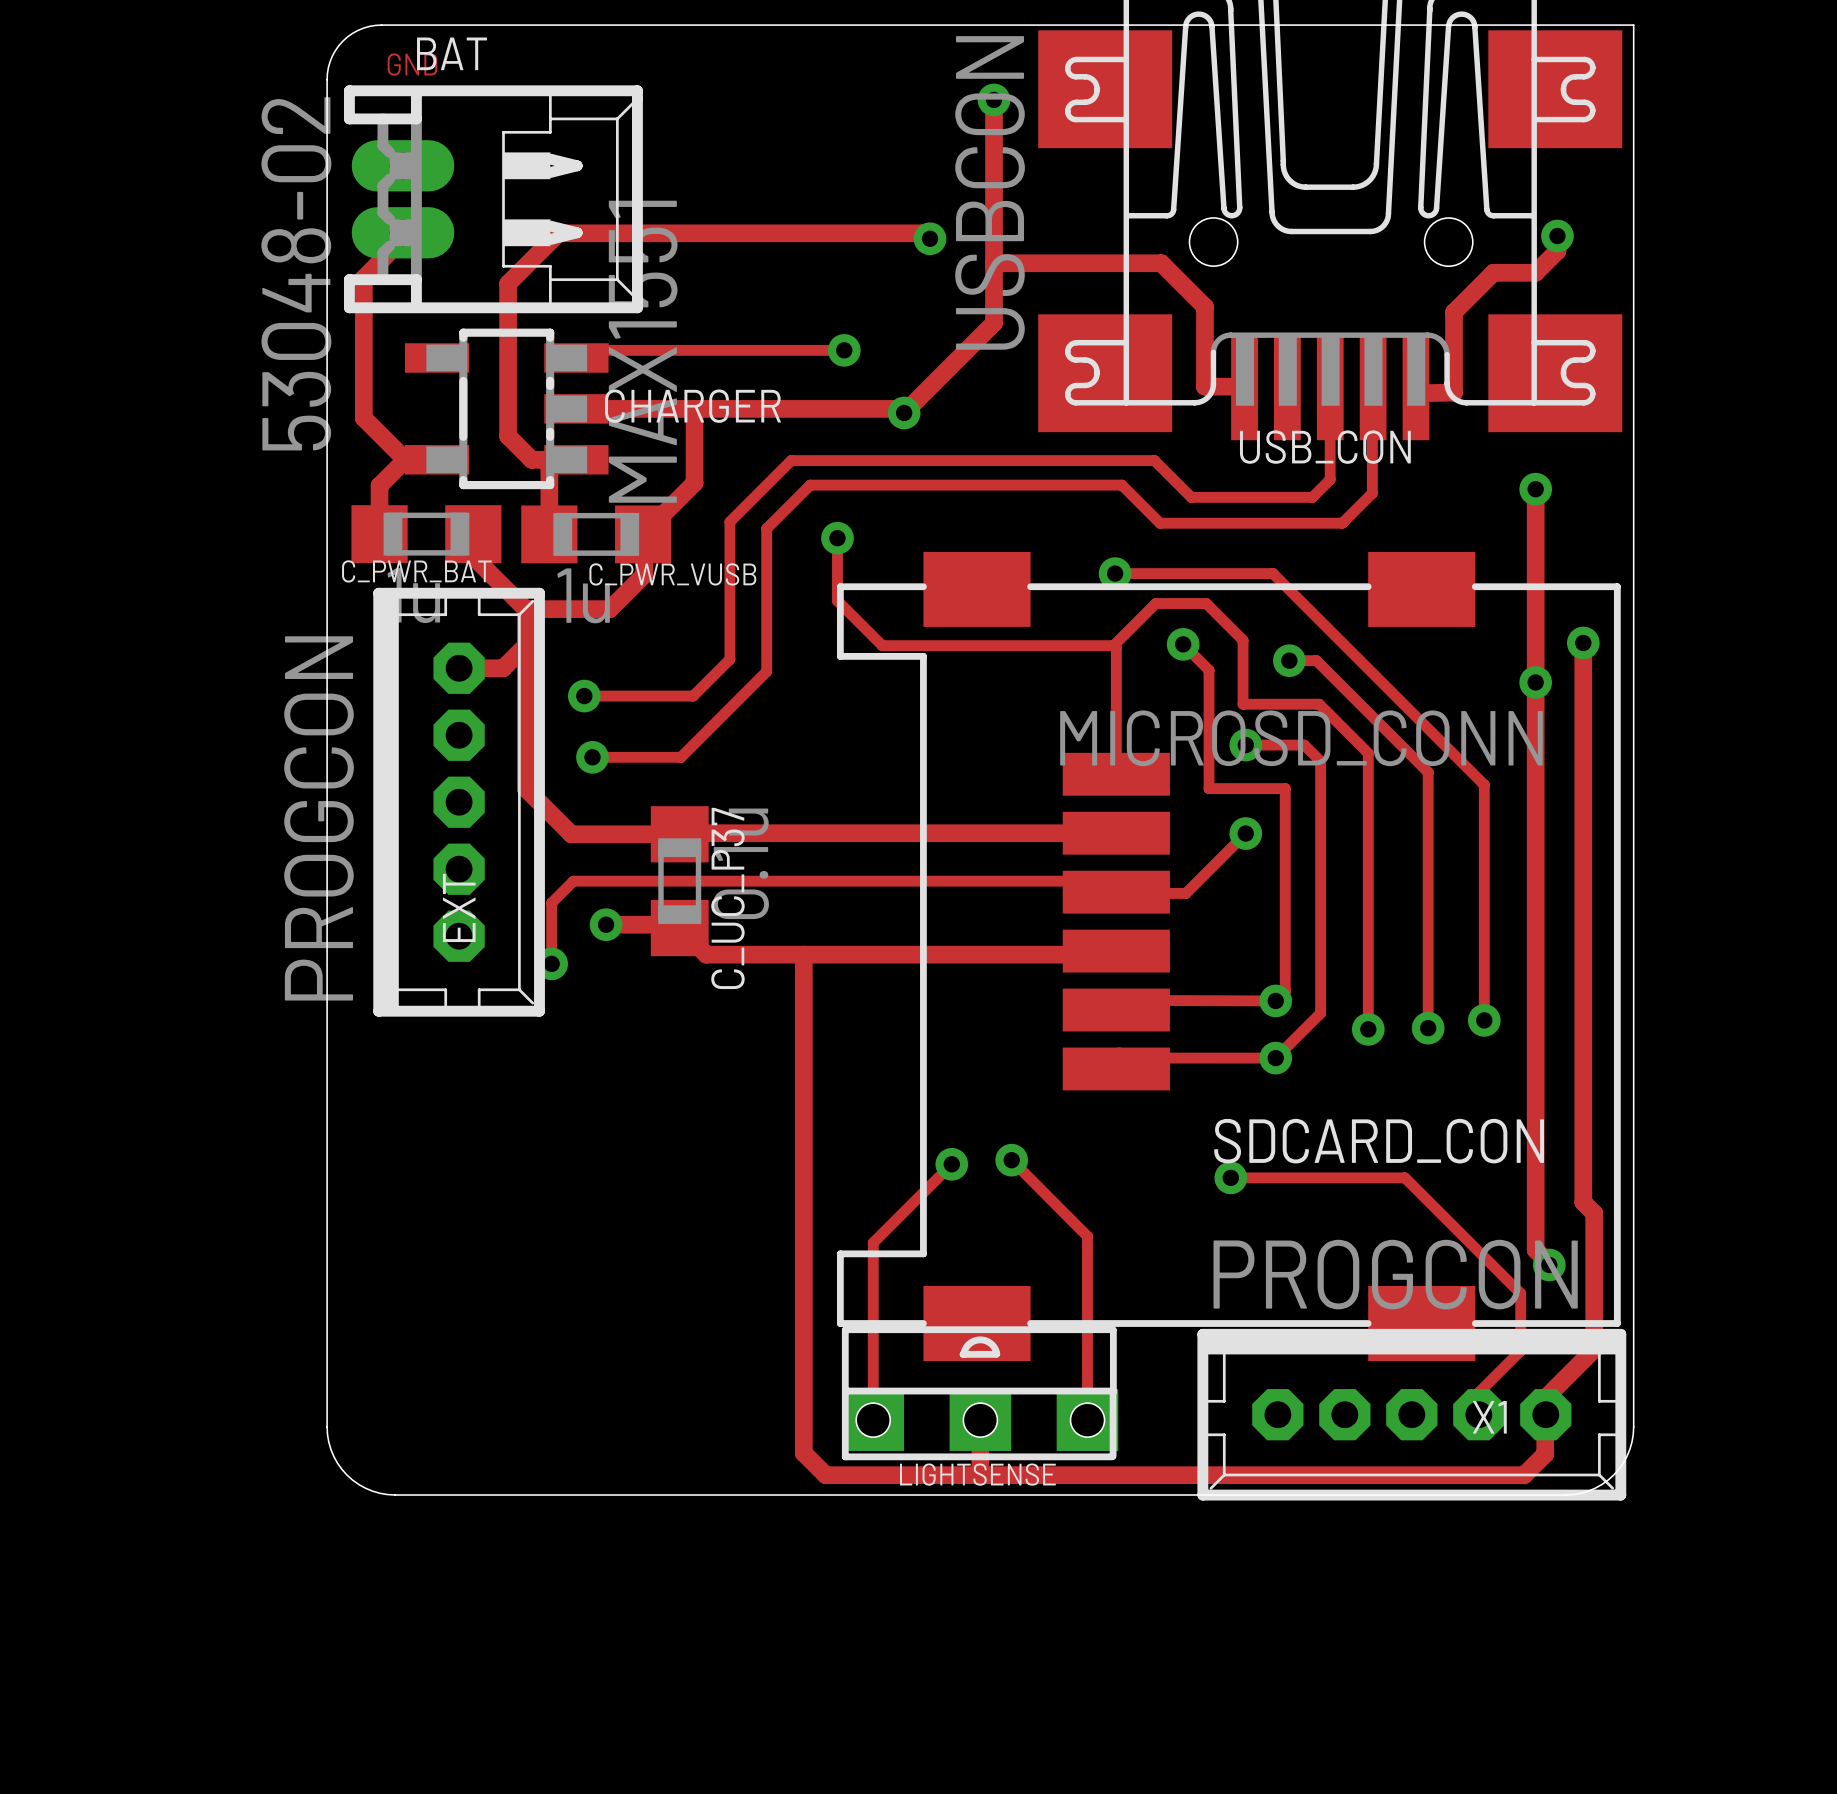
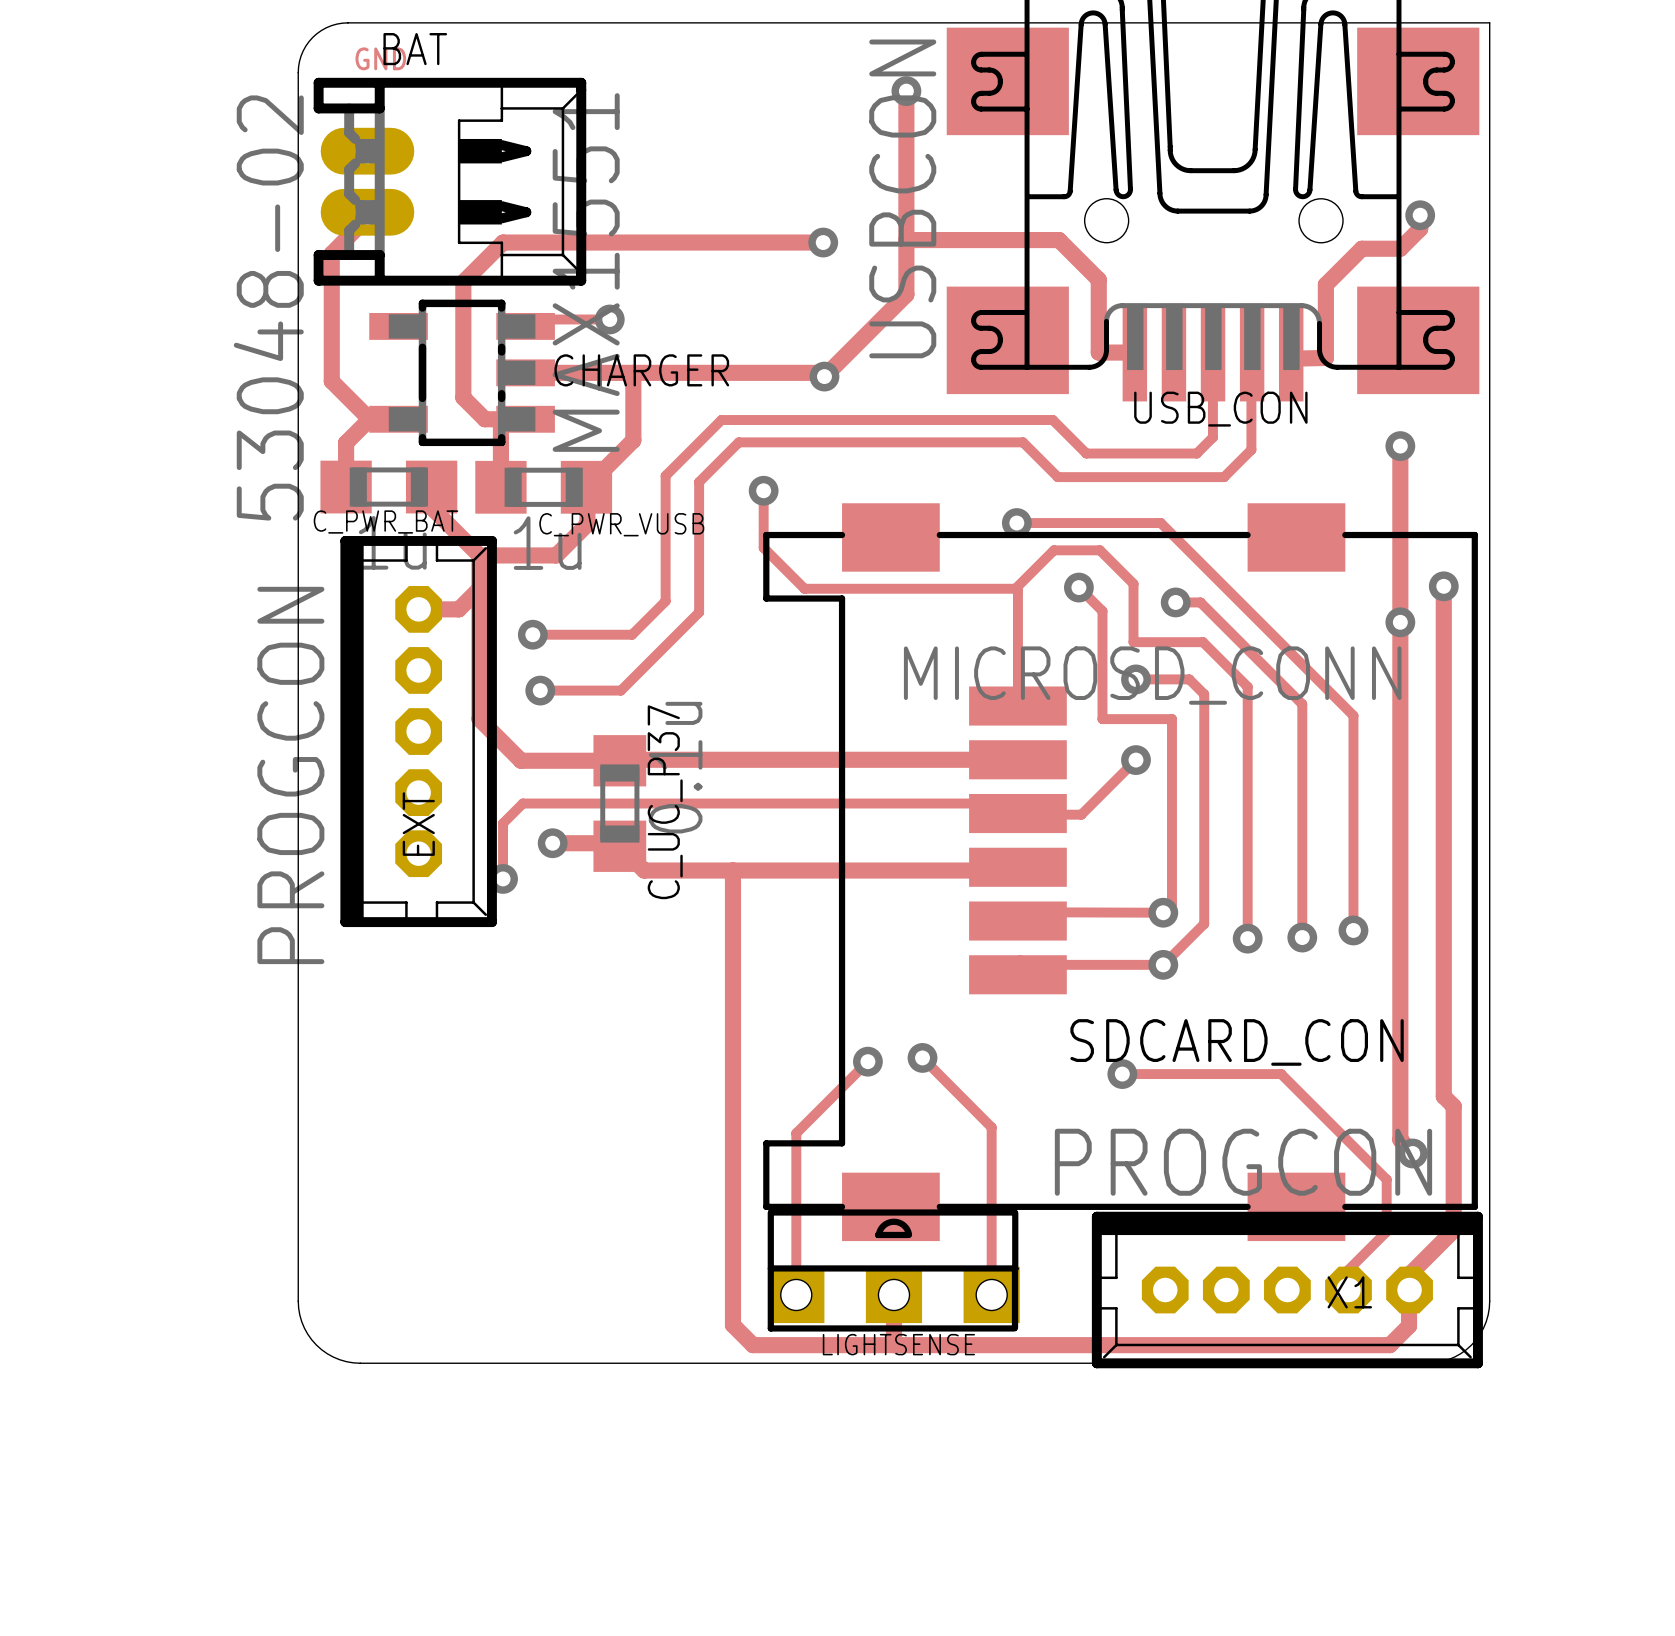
track: (930, 238) (923, 233) (558, 233) (508, 283) (508, 309) -> (823, 242) (503, 242) (463, 282)
via position: (930, 238) -> (823, 242)
track: (668, 350) (844, 350) -> none
via: none -> (609, 319)
via: (844, 350) -> none

